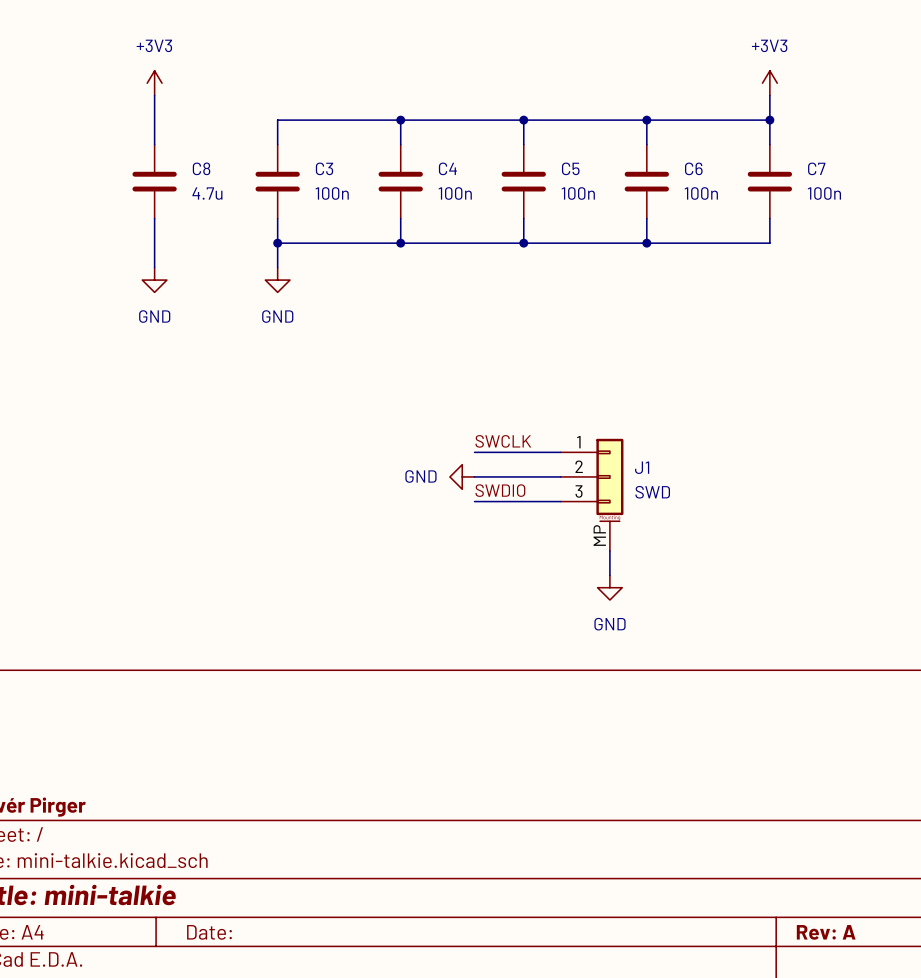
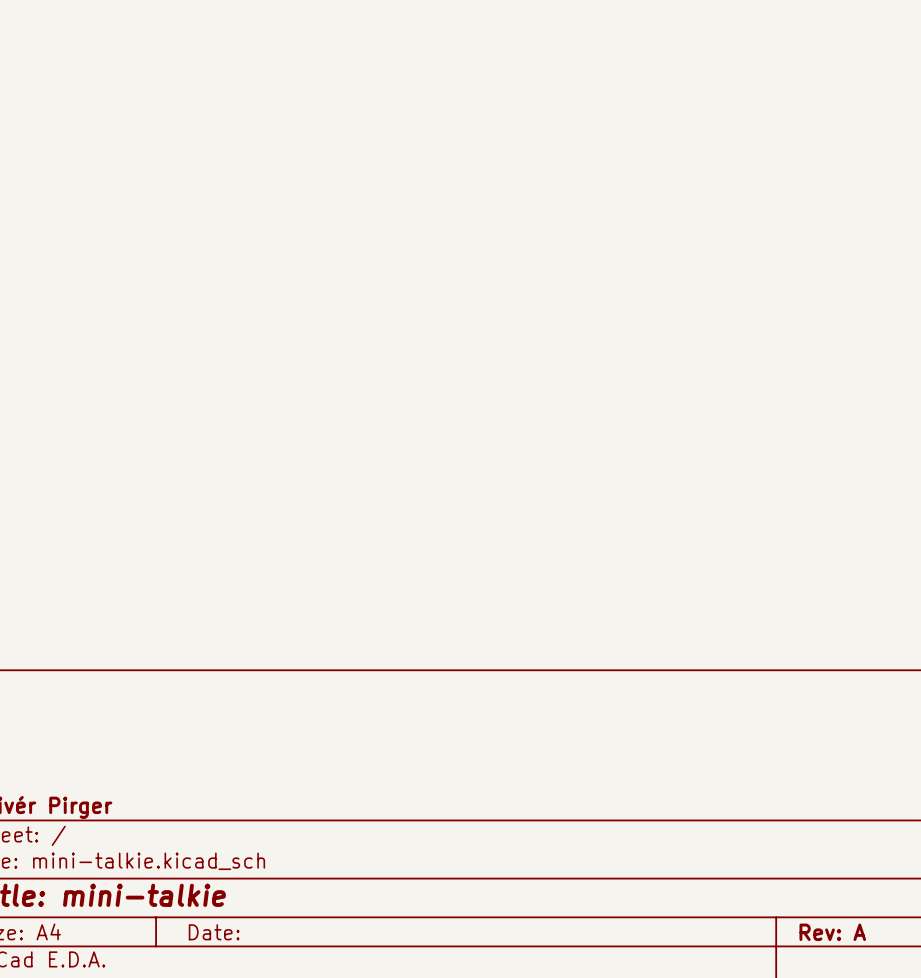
power symbol: +3V3 (154, 83) -> none
power symbol: +3V3 (769, 83) -> none
wire: (154, 95) (154, 144) -> none
wire: (769, 95) (769, 144) -> none
wire: (400, 120) (400, 144) -> none
junction: (400, 120) -> none
wire: (523, 120) (523, 144) -> none
junction: (523, 120) -> none
wire: (646, 120) (646, 144) -> none
junction: (646, 120) -> none
wire: (769, 120) (277, 120) (277, 144) -> none
junction: (769, 120) -> none
C8: 4.7u (154, 181) -> none
C3: 100n (277, 181) -> none
C4: 100n (400, 181) -> none
C5: 100n (523, 181) -> none
C6: 100n (646, 181) -> none
C7: 100n (769, 181) -> none
wire: (154, 218) (154, 267) -> none
wire: (277, 218) (277, 267) -> none
wire: (400, 218) (400, 243) -> none
wire: (523, 218) (523, 243) -> none
wire: (646, 218) (646, 243) -> none
wire: (769, 218) (769, 243) (277, 243) -> none
junction: (277, 243) -> none
junction: (400, 243) -> none
junction: (523, 243) -> none
junction: (646, 243) -> none
power symbol: GND (154, 280) -> none
power symbol: GND (277, 280) -> none
label: SWCLK (503, 441) -> none
wire: (474, 452) (560, 452) -> none
power symbol: GND (462, 476) -> none
wire: (474, 476) (560, 476) -> none
label: SWDIO (500, 490) -> none
J1: SWD (592, 494) -> none
wire: (474, 501) (560, 501) -> none
wire: (609, 550) (609, 575) -> none
power symbol: GND (609, 587) -> none

